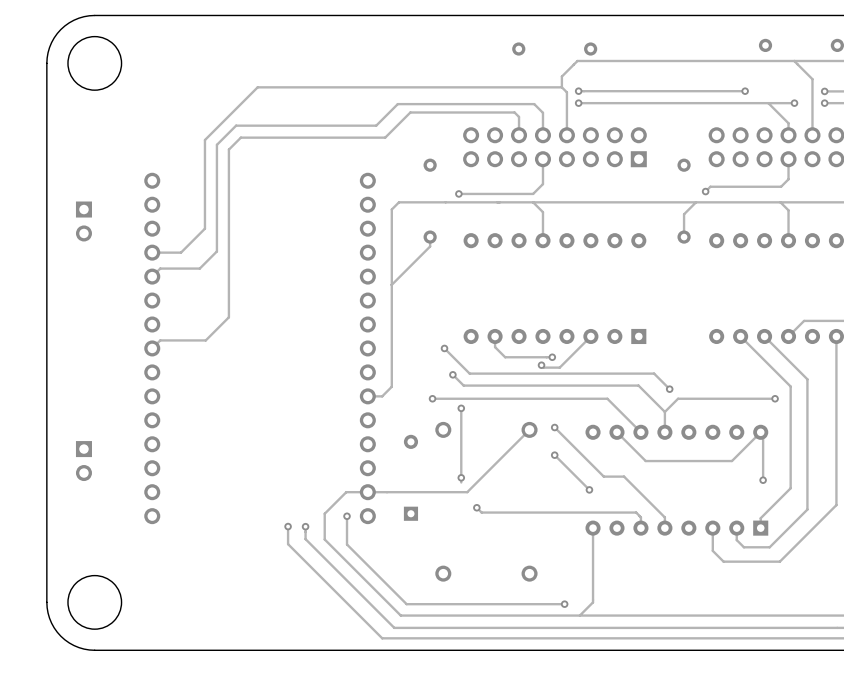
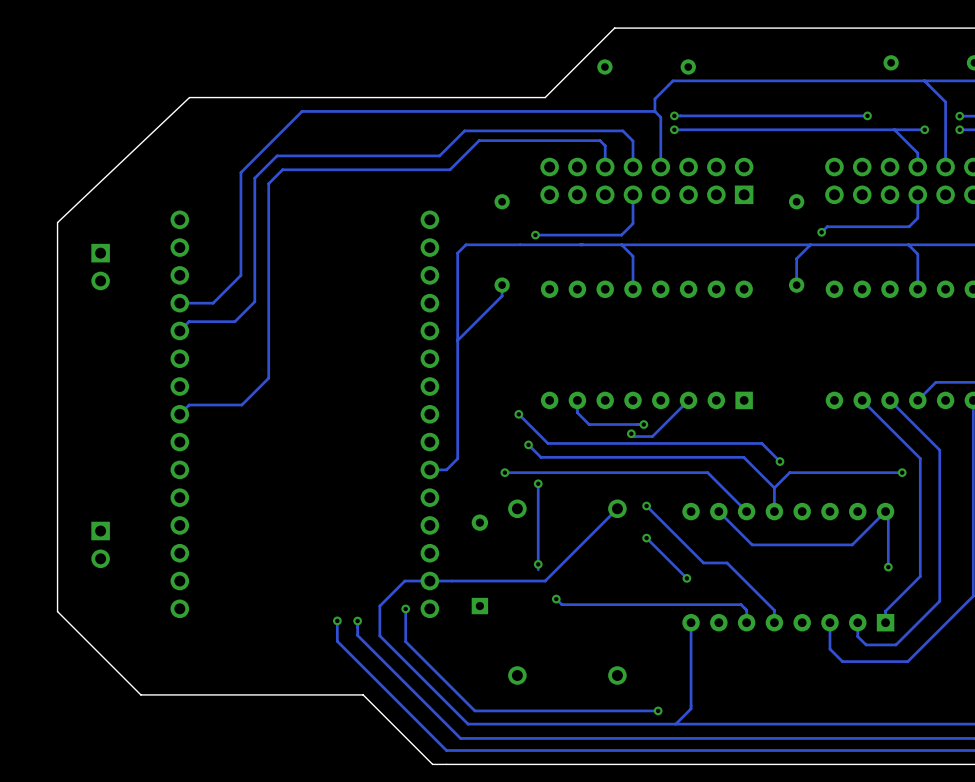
board edge: (527, 15) (94, 15) (78, 18) (64, 25) (57, 33) (48, 52) (46, 183) -> (614, 28) (545, 97) (189, 97) (57, 222)
round board edge: [67, 36, 122, 91] -> none
board edge: (46, 518) (48, 613) (57, 632) (69, 642) (78, 647) (94, 650) (370, 650) -> (57, 611) (140, 694) (363, 694) (432, 764)
round board edge: [67, 575, 122, 630] -> none

